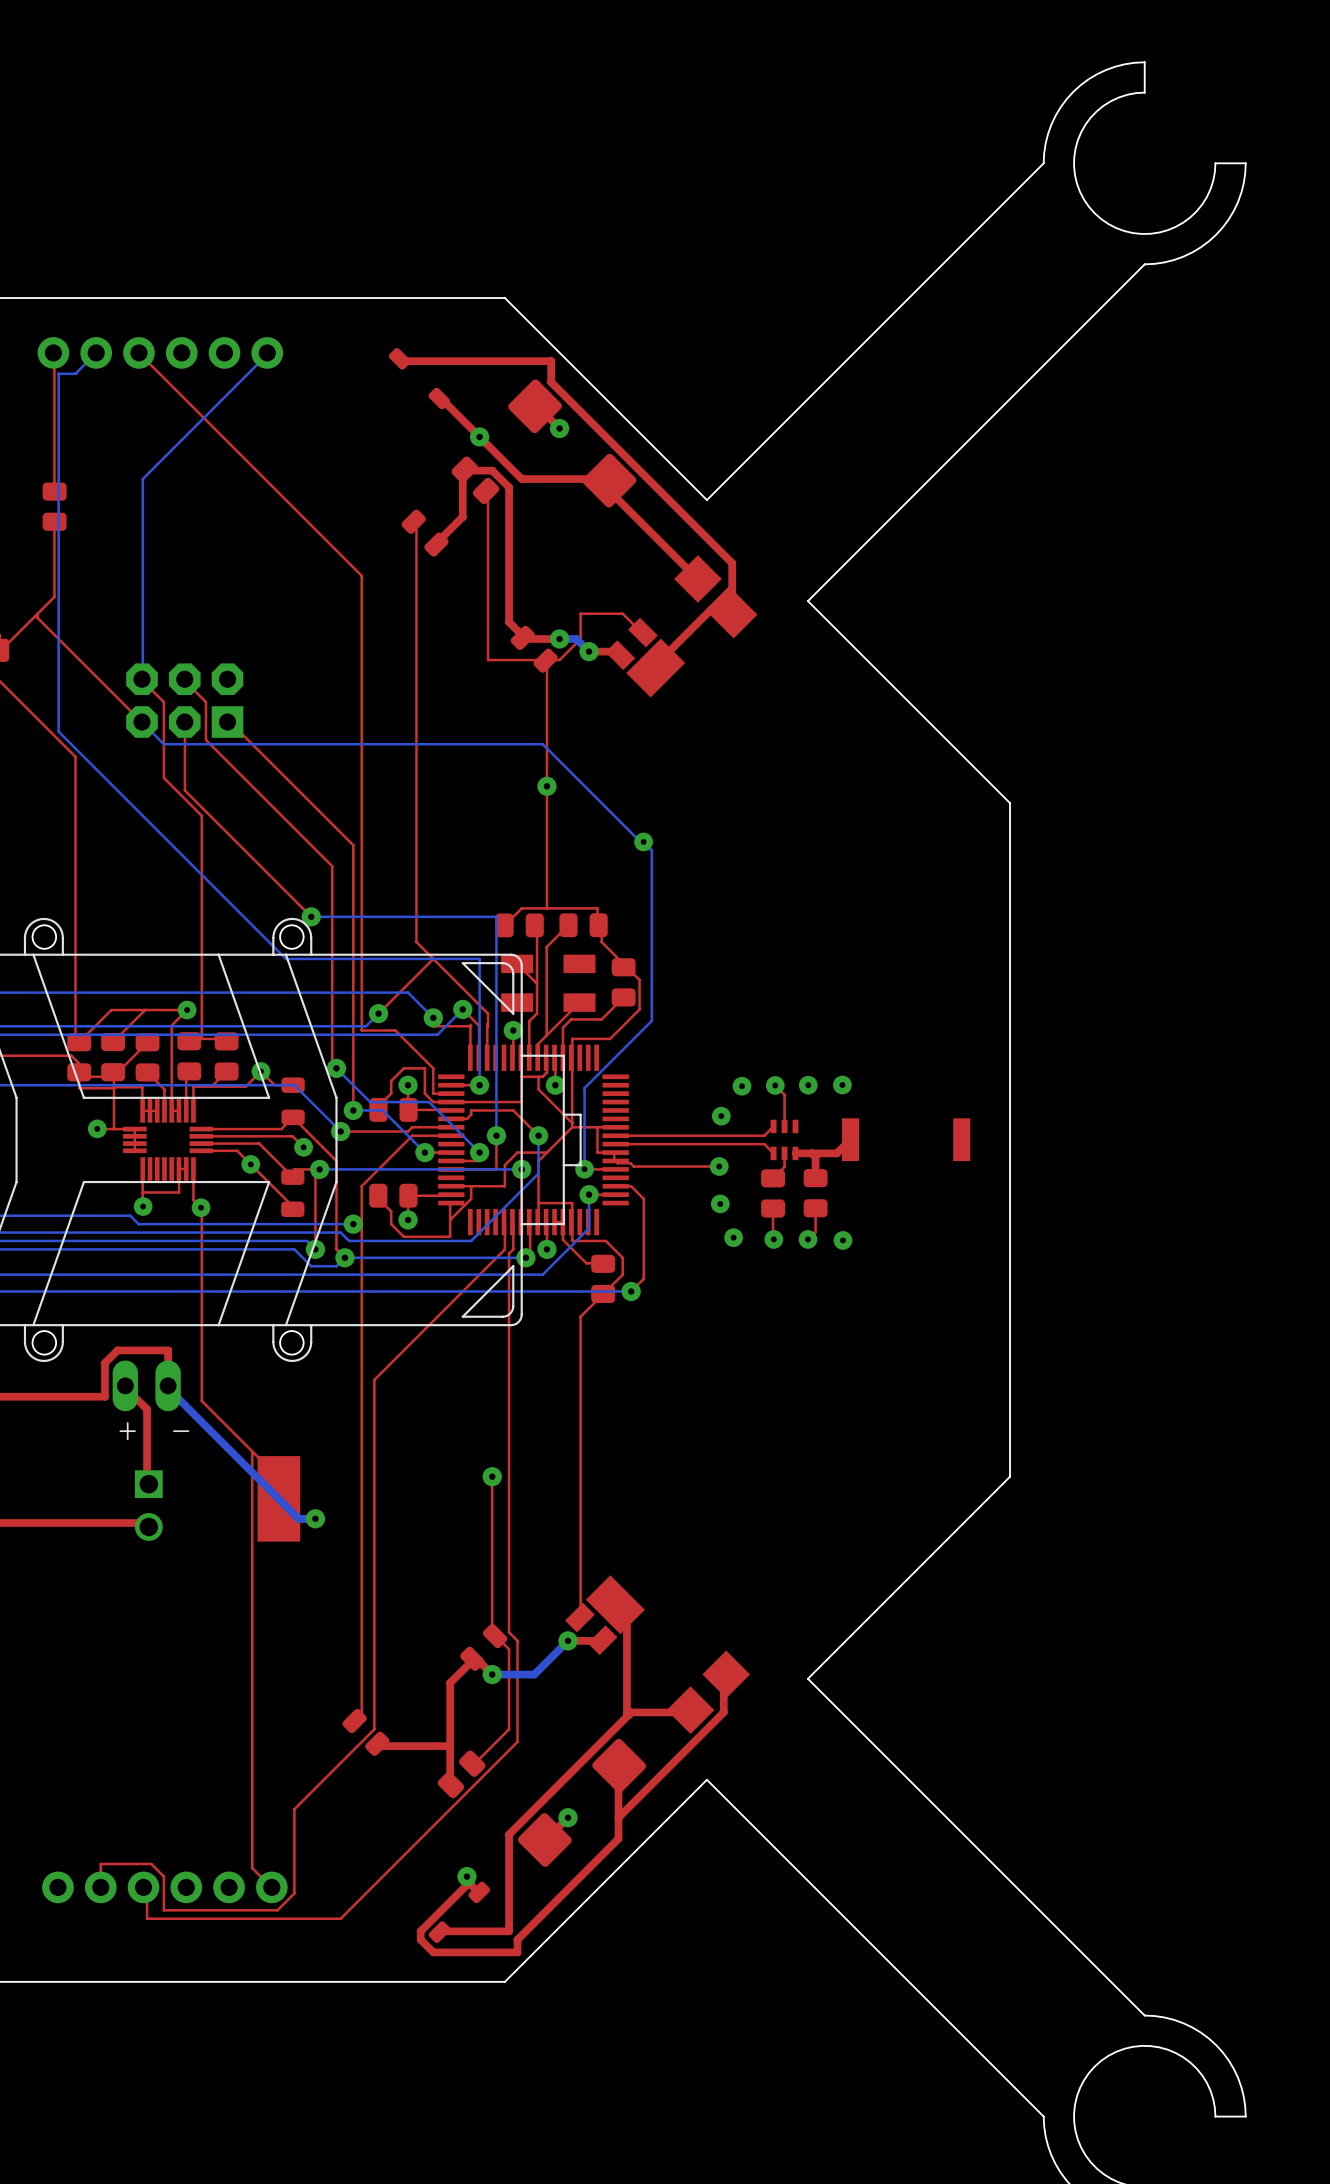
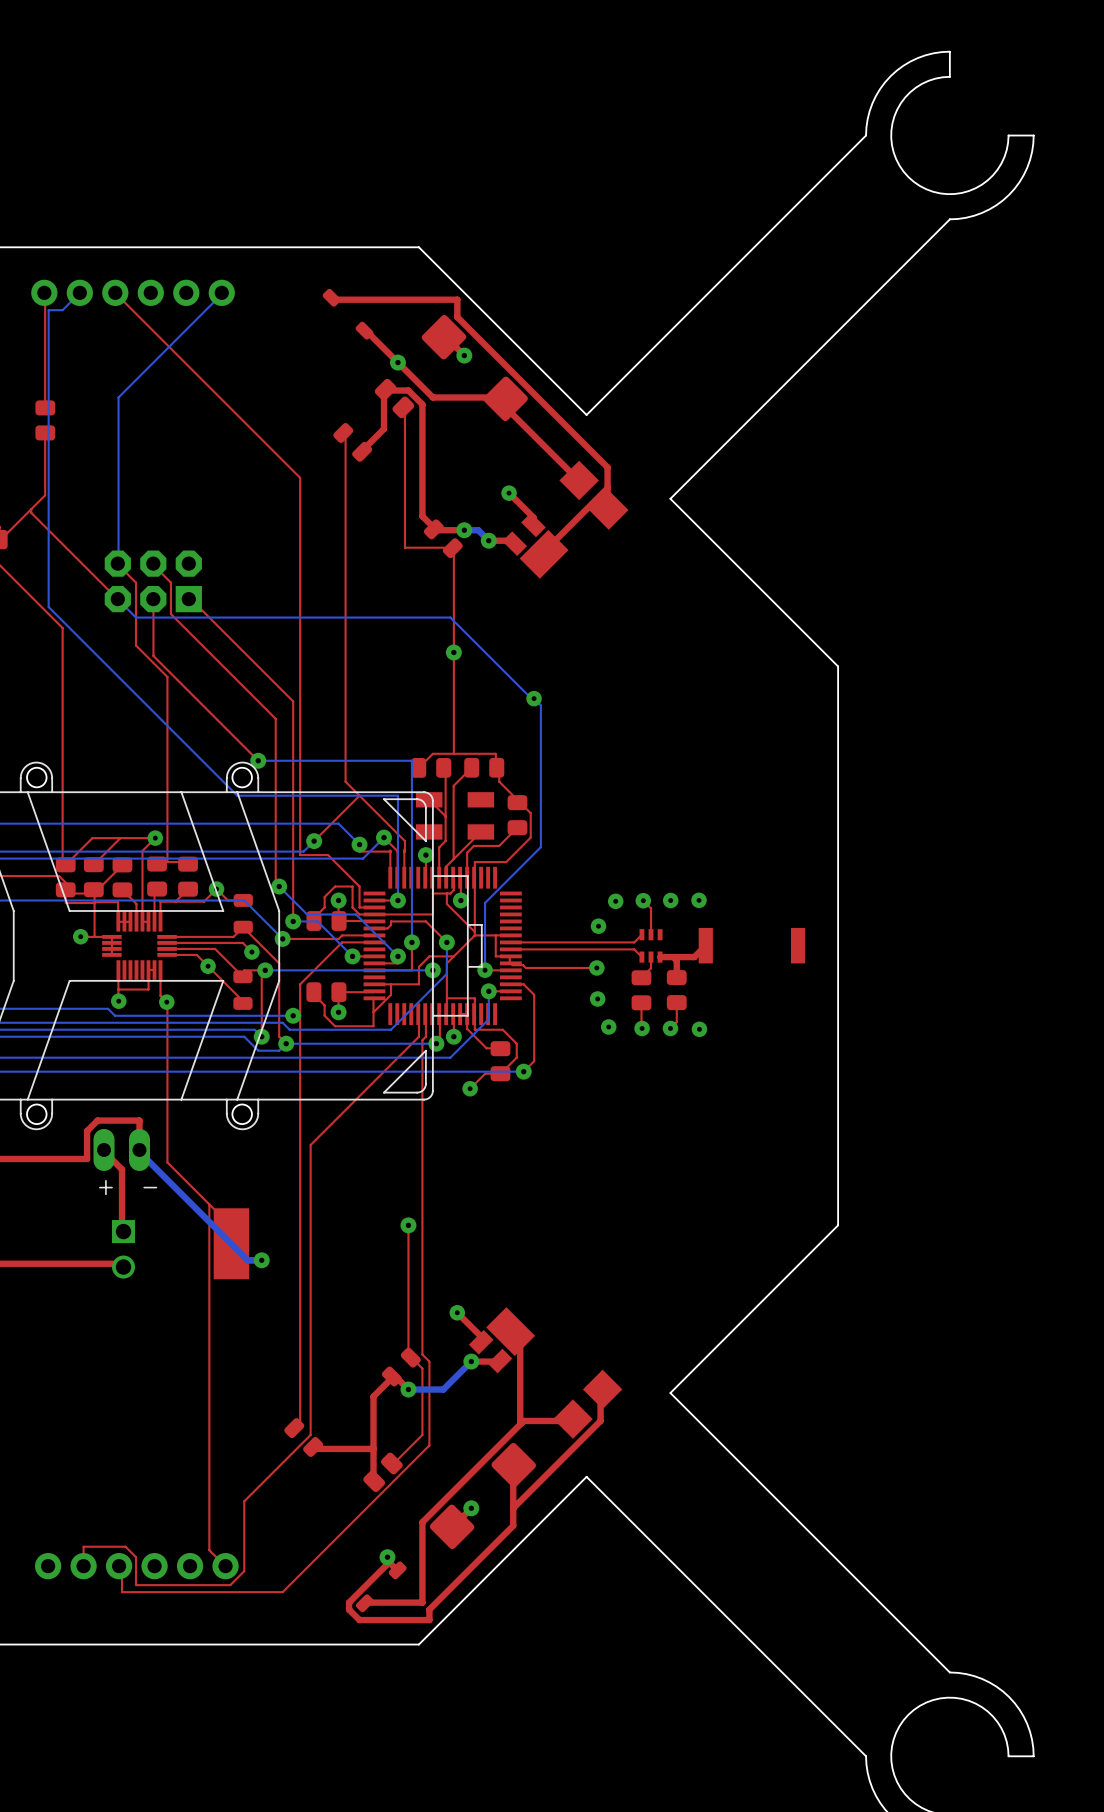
via: none -> (509, 493)
top track: (642, 632) (622, 613) (580, 613) (580, 639) (559, 660) (546, 660) -> (533, 524) (533, 517) (509, 493)
top track: none -> (500, 1073) (485, 1073) (470, 1088)
top track: (601, 1295) (580, 1316) (579, 1617) -> (457, 1312) (481, 1336) (481, 1342)
via: none -> (470, 1088)
via: none -> (457, 1312)

